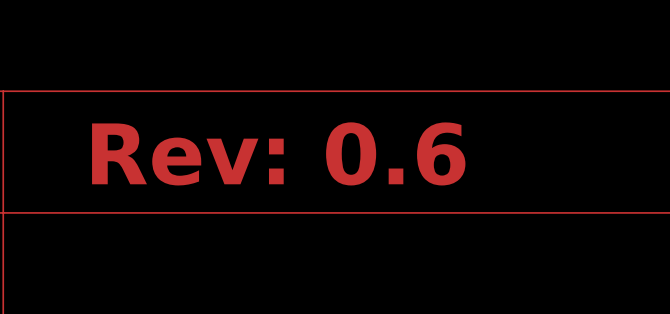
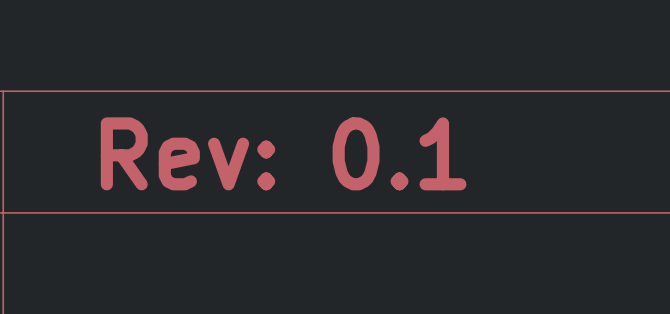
title block: Rev: 0.6 (278, 153) -> Rev: 0.1 (283, 153)

